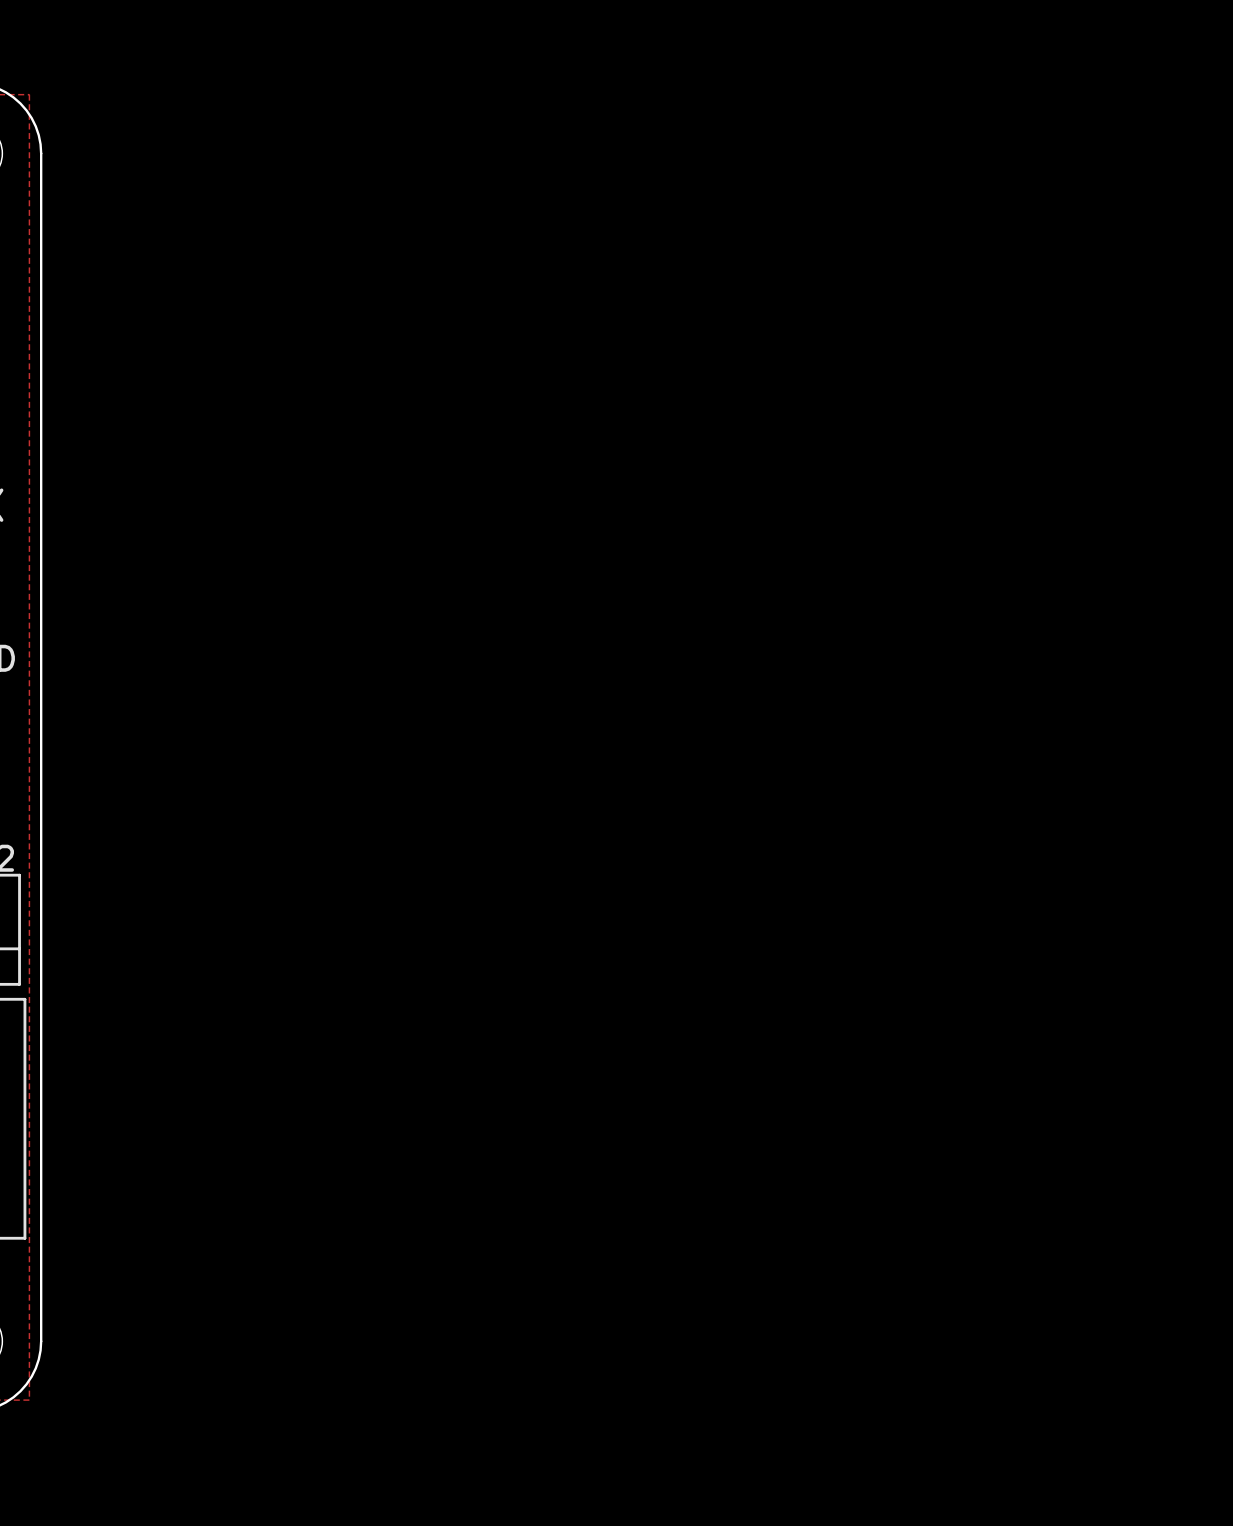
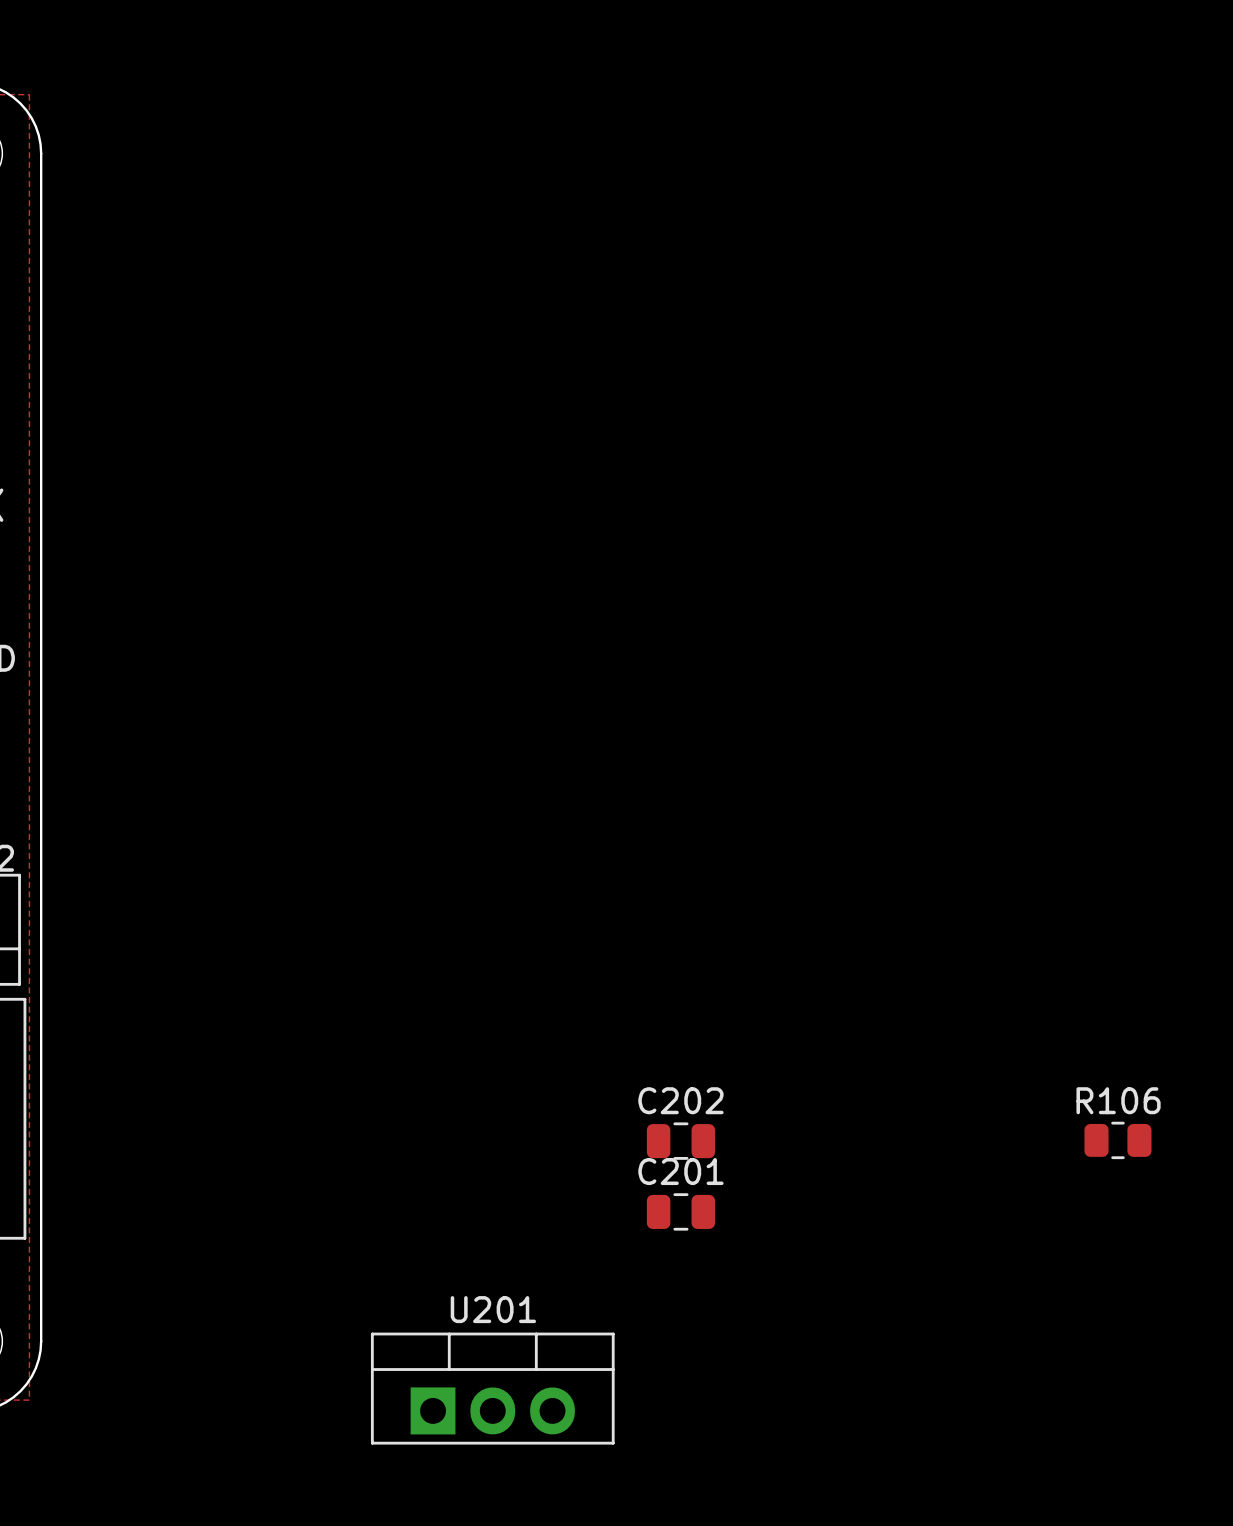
R106: none -> (1117, 1140)
C202: none -> (680, 1141)
C201: none -> (680, 1211)
U201: none -> (492, 1388)

